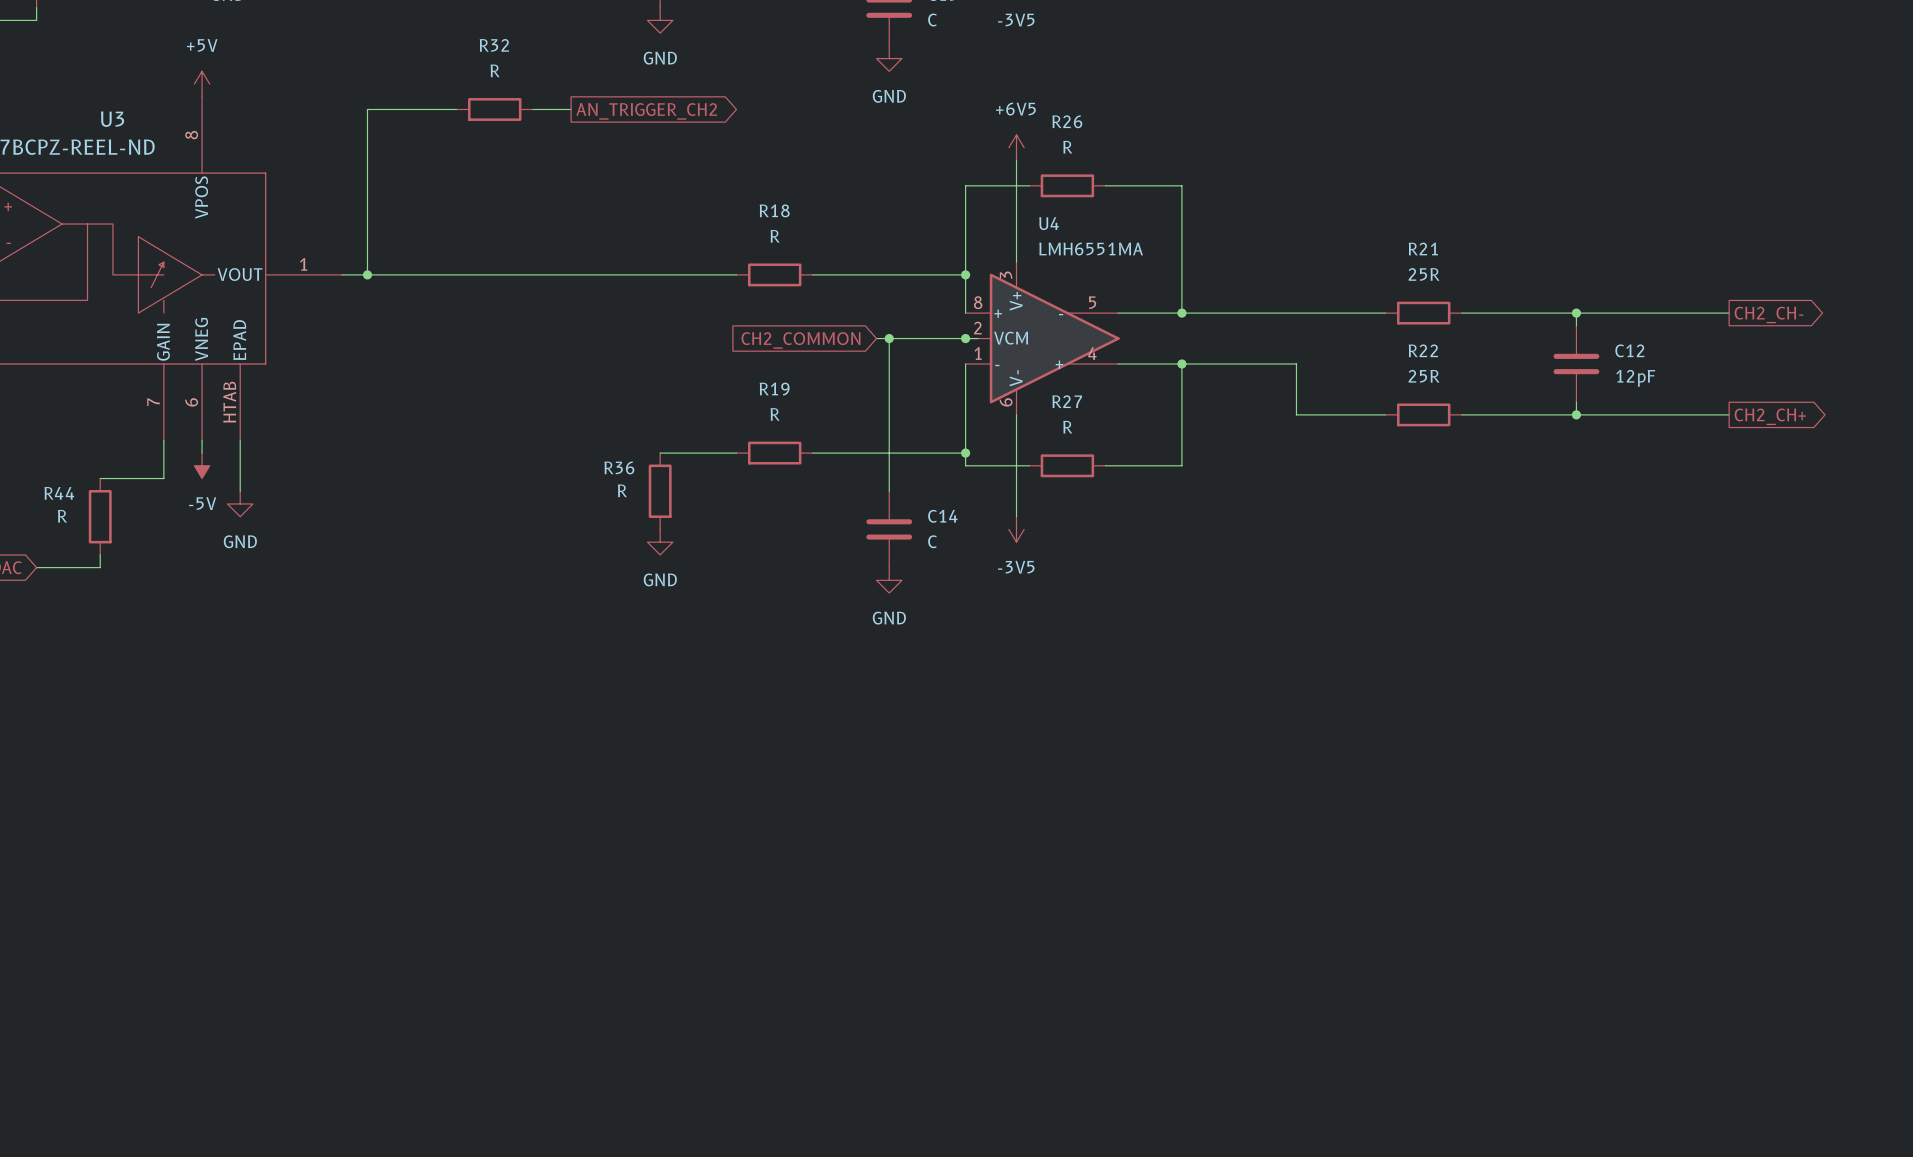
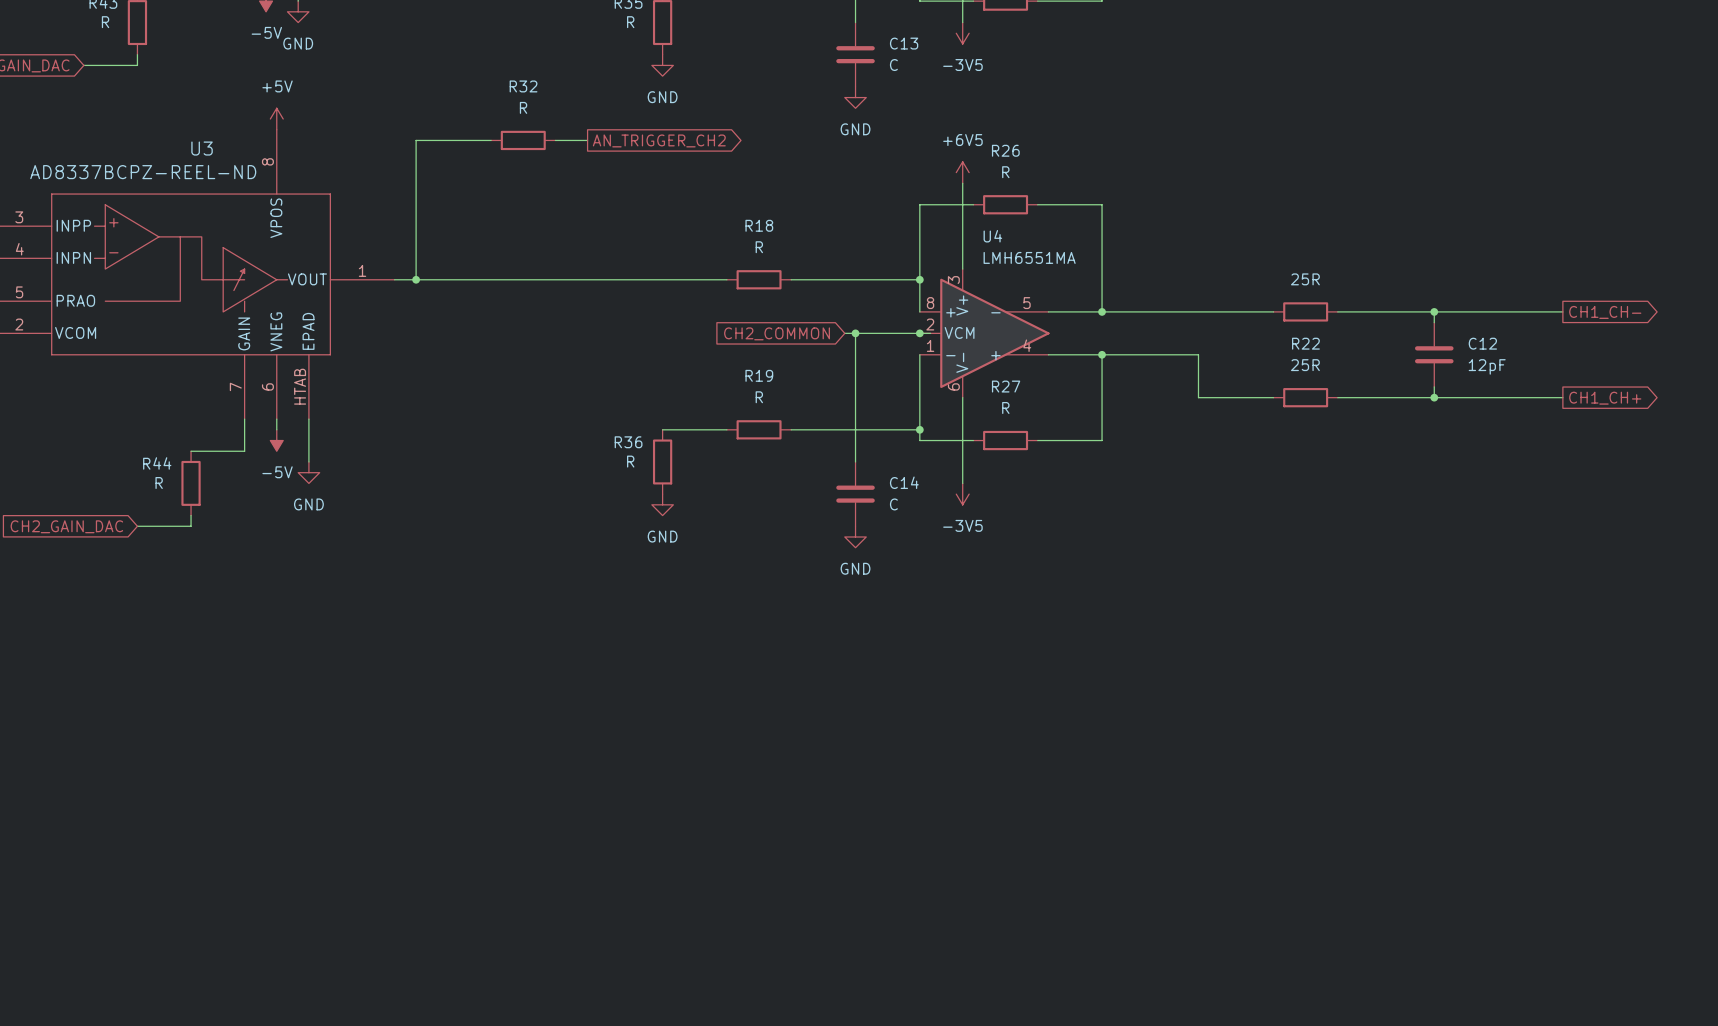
R21 name: R21 (1423, 248) -> none
global label: CH2_CH- (1769, 314) -> CH1_CH- (1605, 312)
global label: CH2_CH+ (1770, 416) -> CH1_CH+ (1605, 398)

